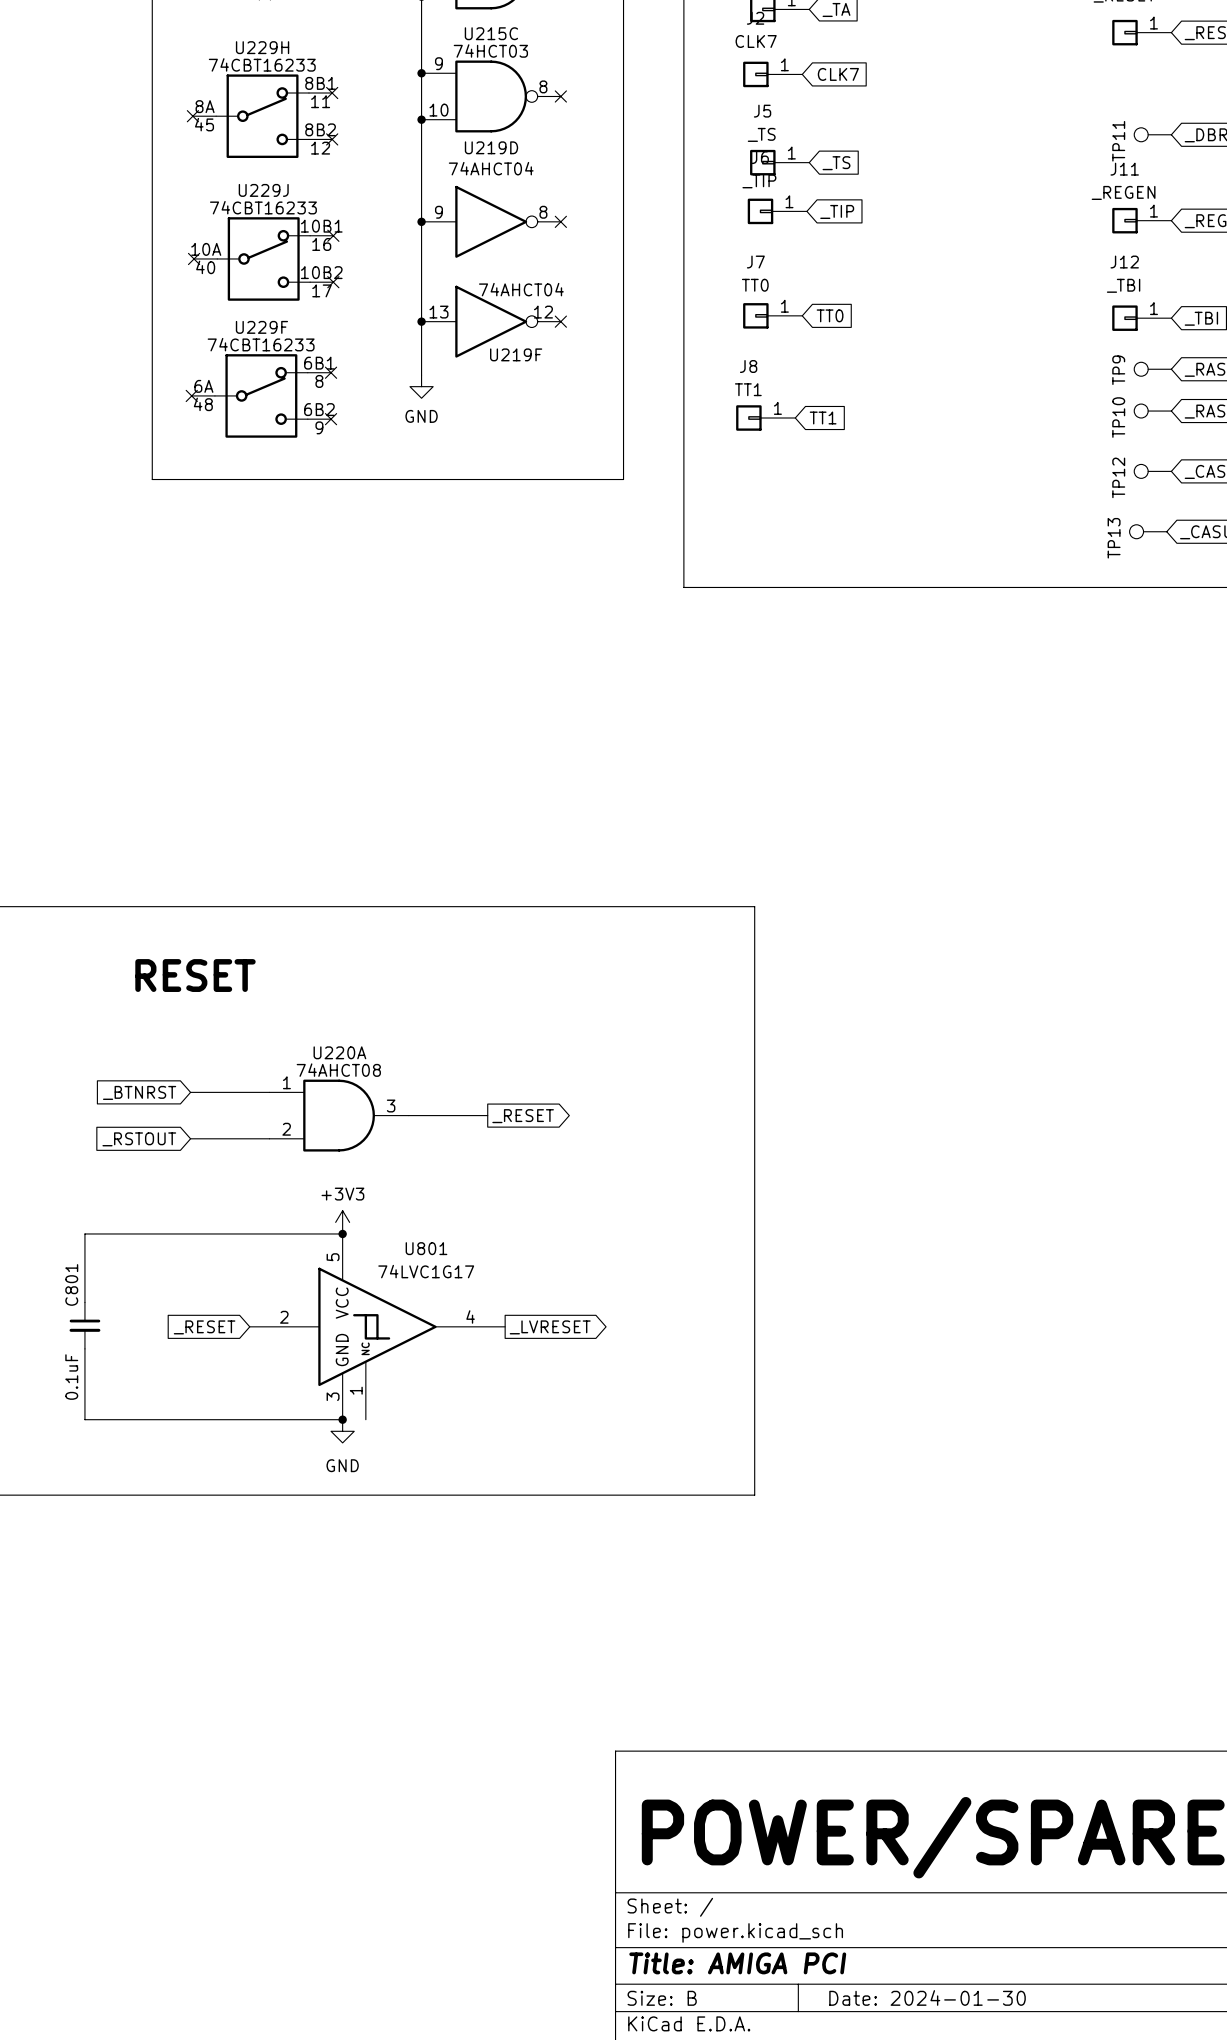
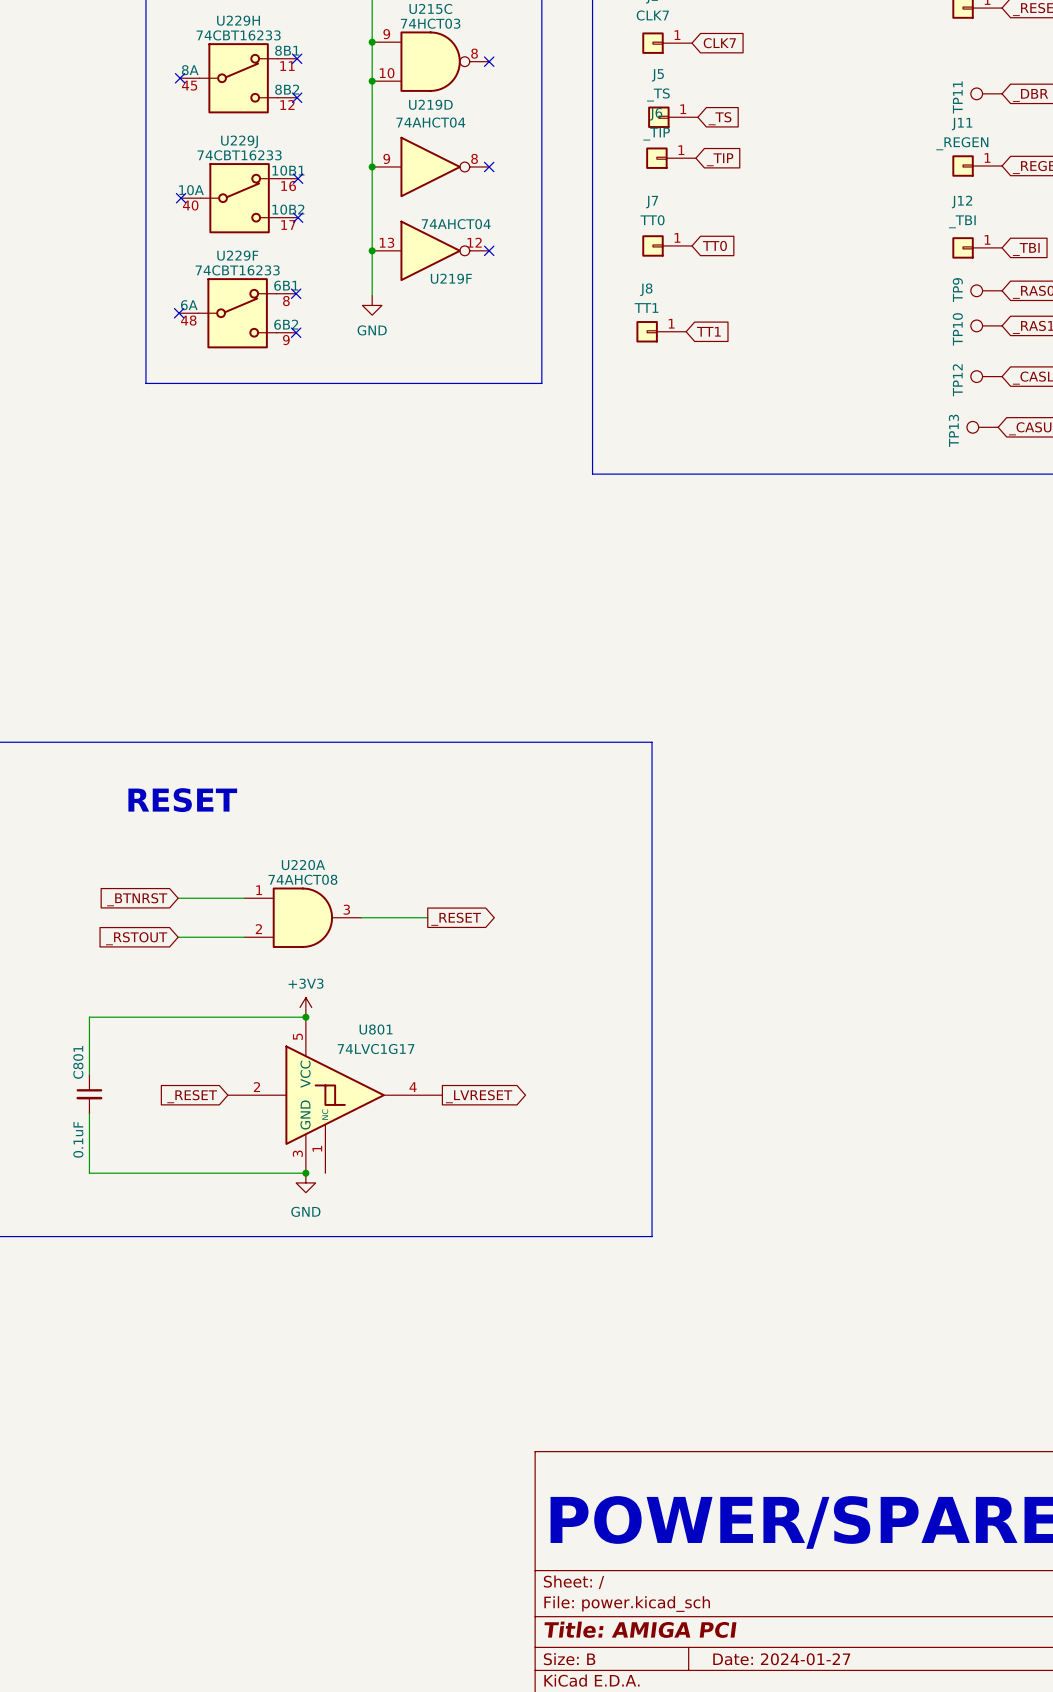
title block: Date: 2024-01-30 (927, 1997) -> Date: 2024-01-27 (781, 1659)

